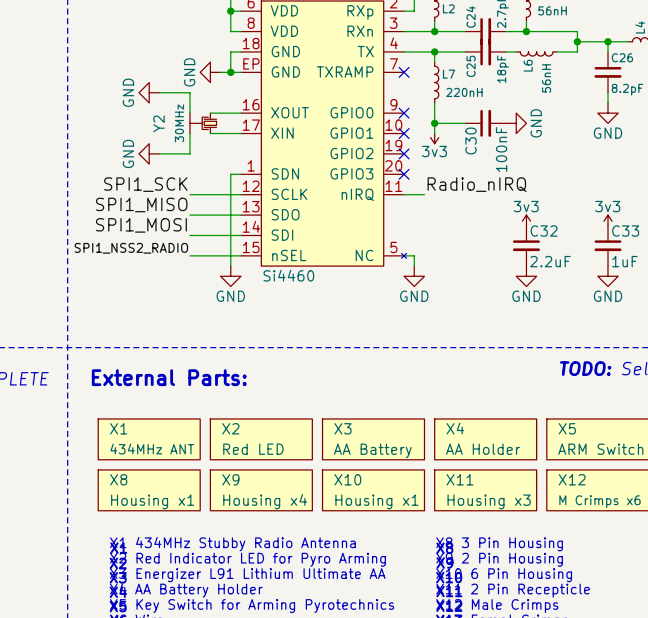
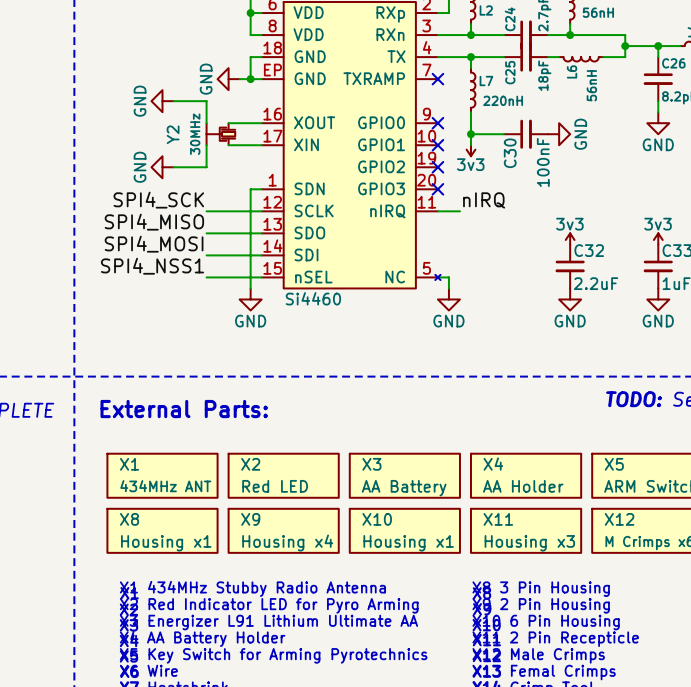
label: SPI1_SCK (145, 184) -> SPI4_SCK (158, 200)
label: Radio_nIRQ (477, 184) -> nIRQ (484, 200)
label: SPI1_MISO (141, 205) -> SPI4_MISO (154, 222)
label: SPI1_MOSI (141, 225) -> SPI4_MOSI (154, 244)
label: SPI1_NSS2_RADIO (131, 248) -> SPI4_NSS1 (152, 266)

